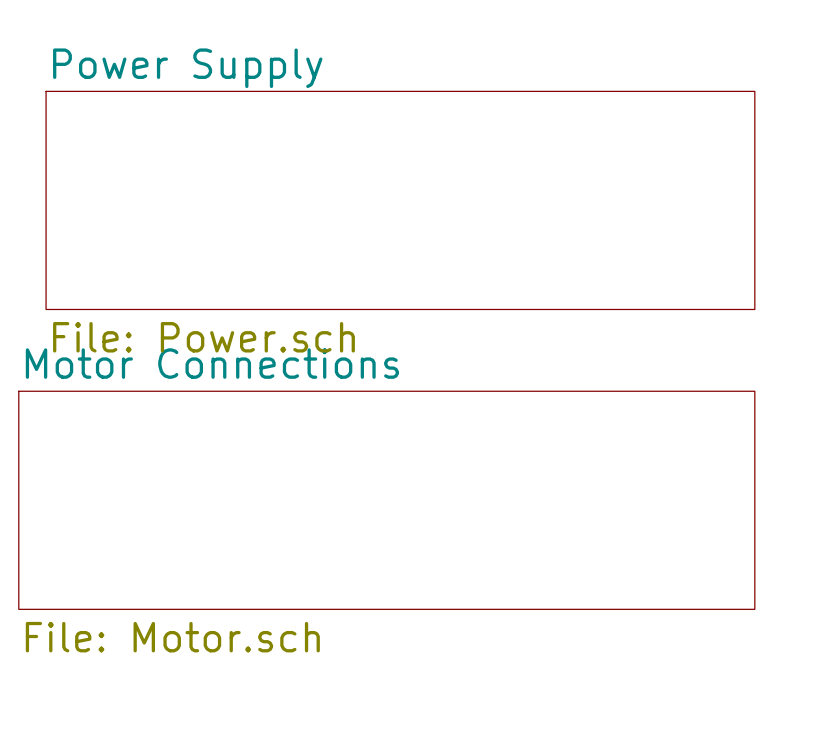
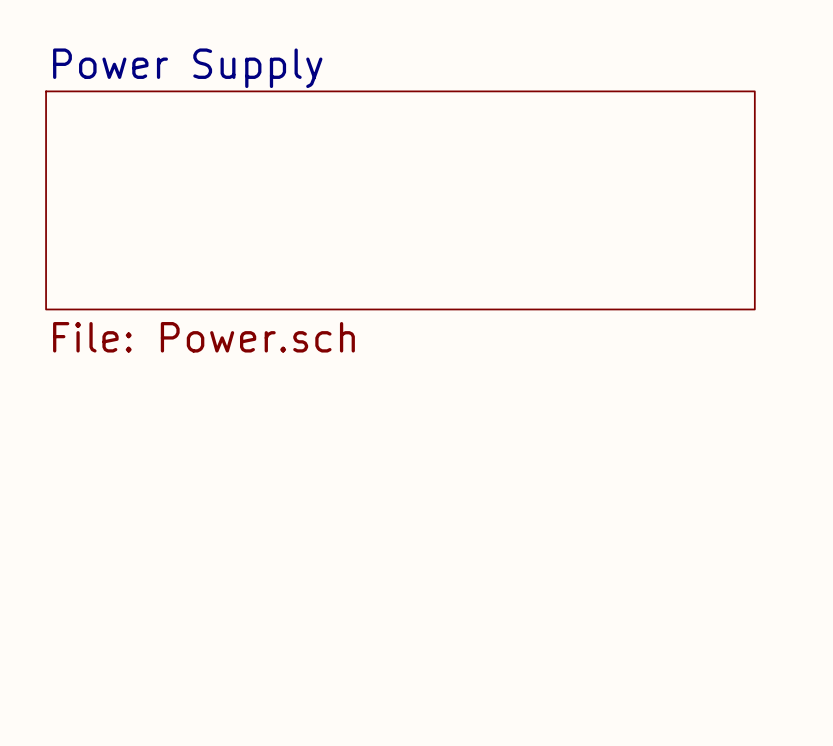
sheet Motor Connections: File: Motor.sch (386, 500) -> none

